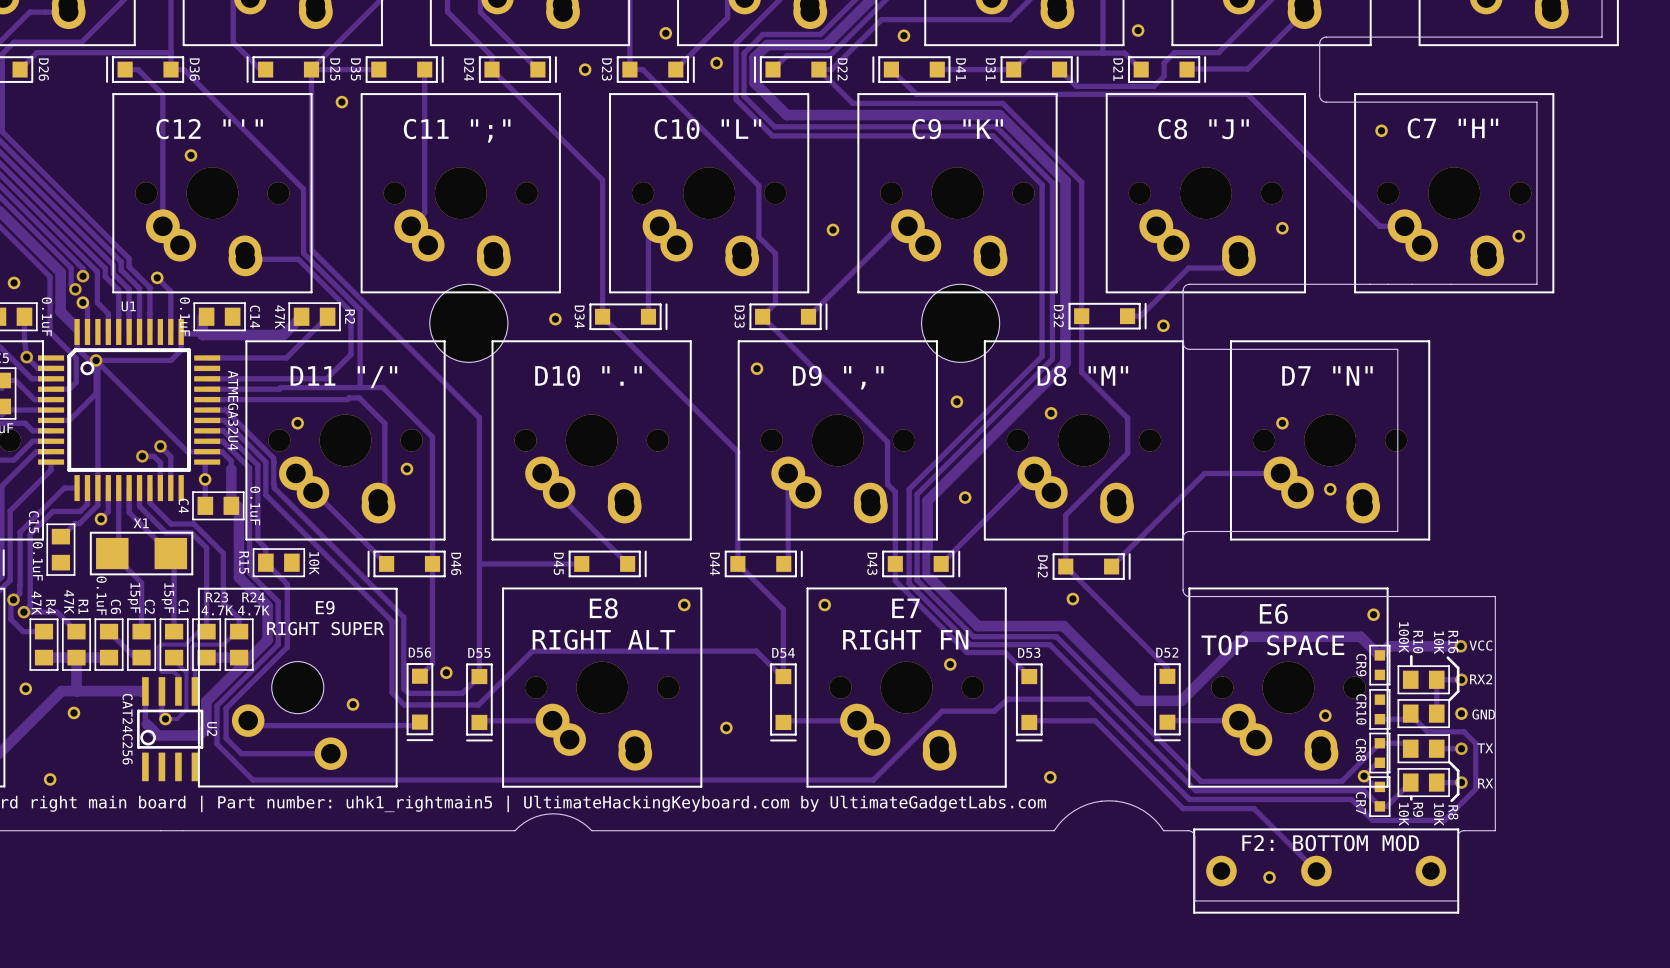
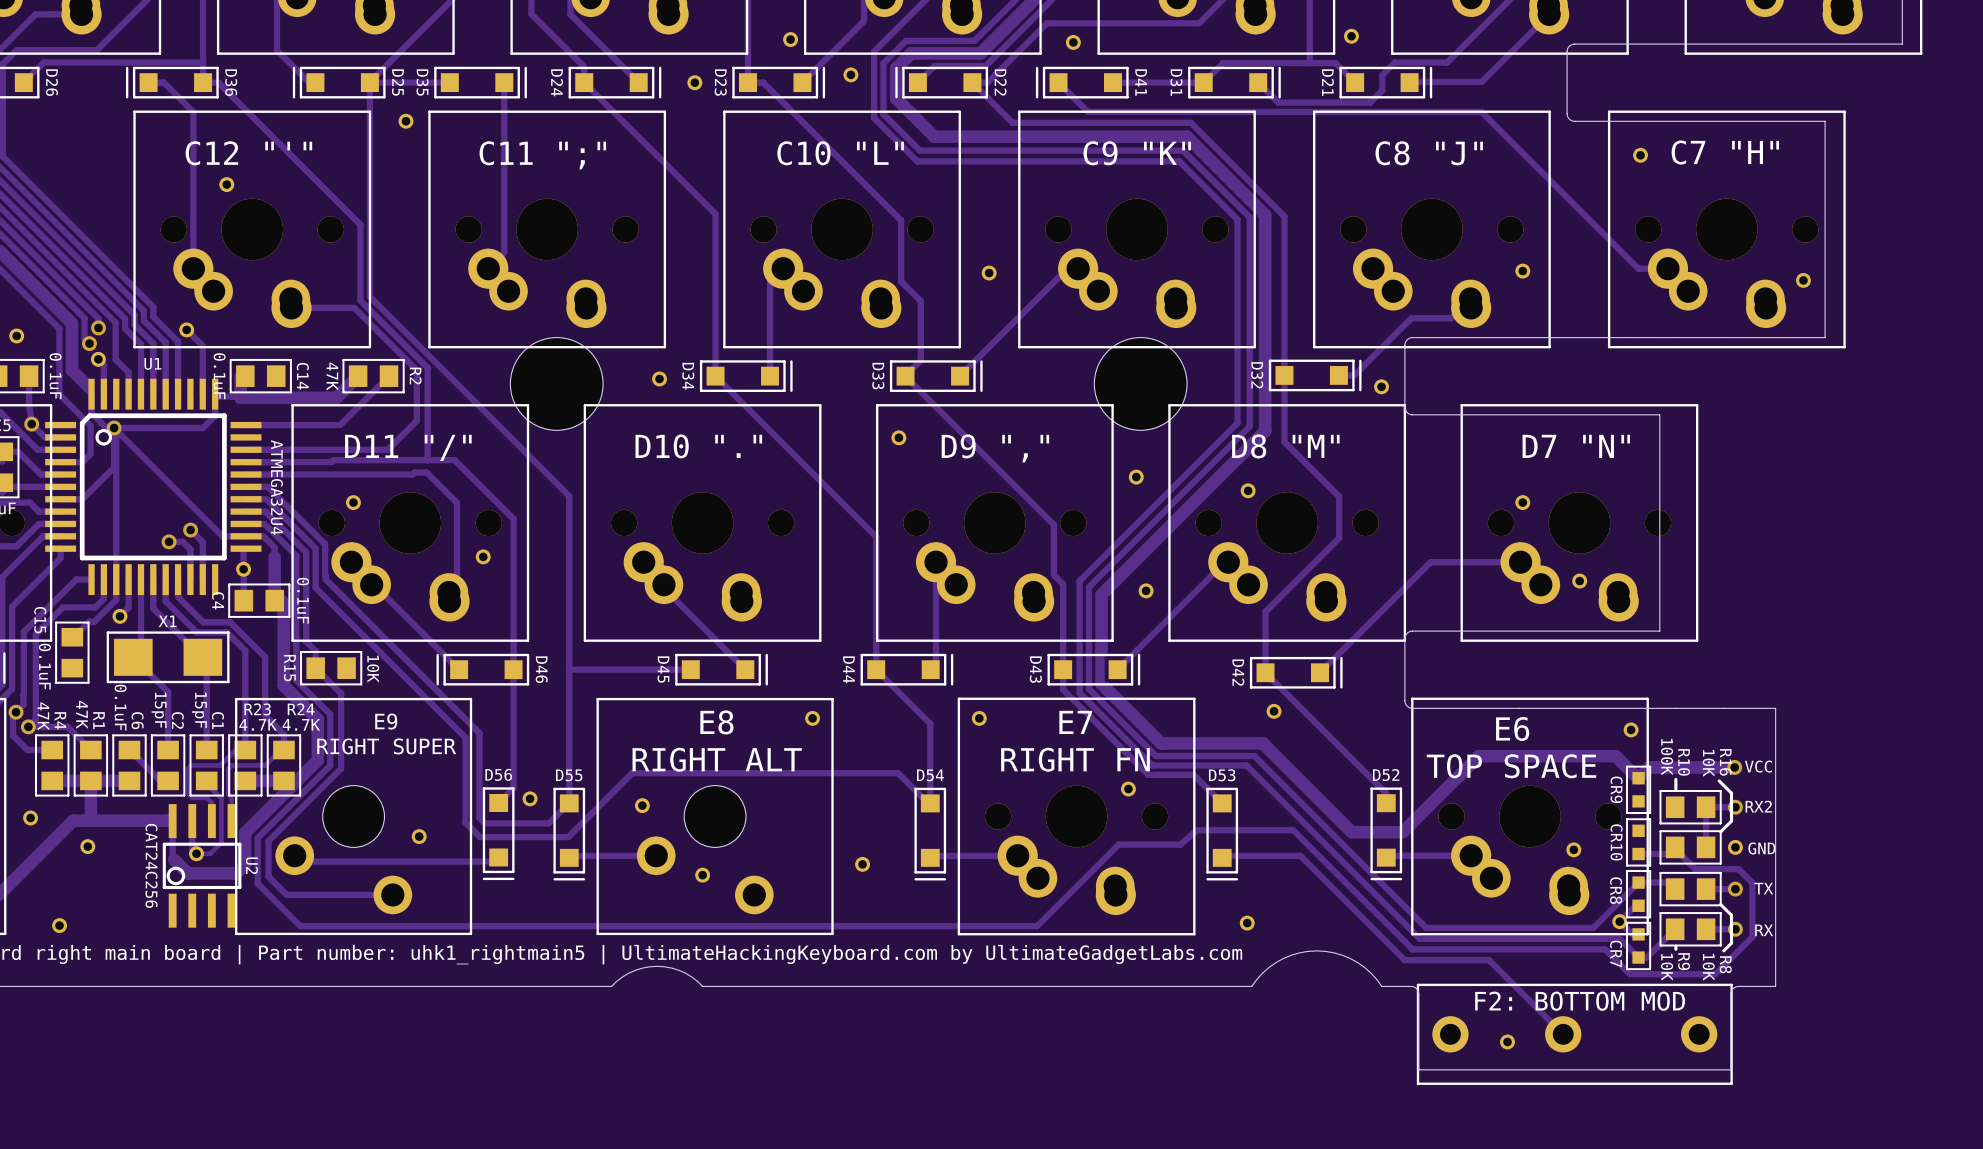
part footprint: [502, 587, 703, 788] -> [596, 697, 834, 936]
part: none -> (642, 805)
part: none -> (702, 875)

